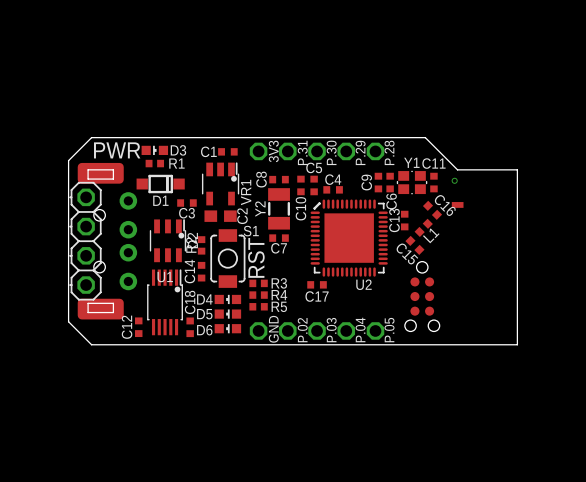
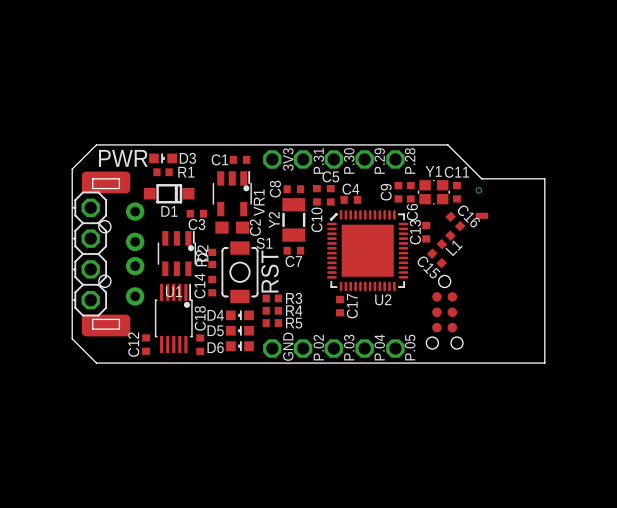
C17 rotation: 0° (317, 284) -> 90° clockwise (340, 306)

